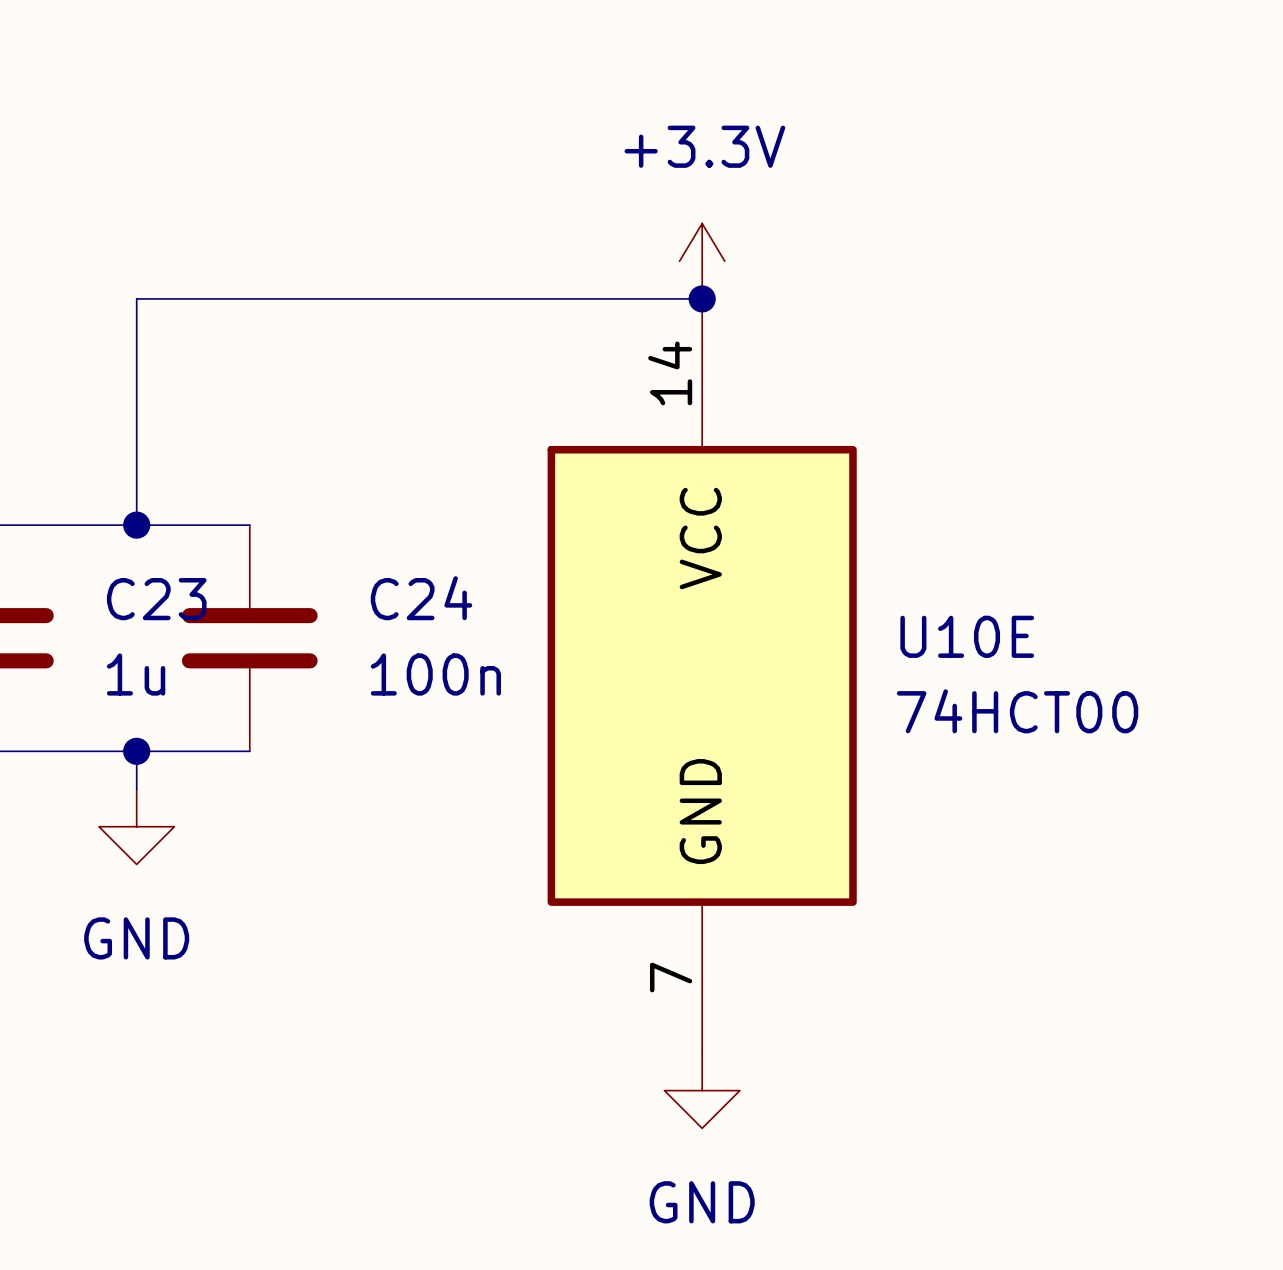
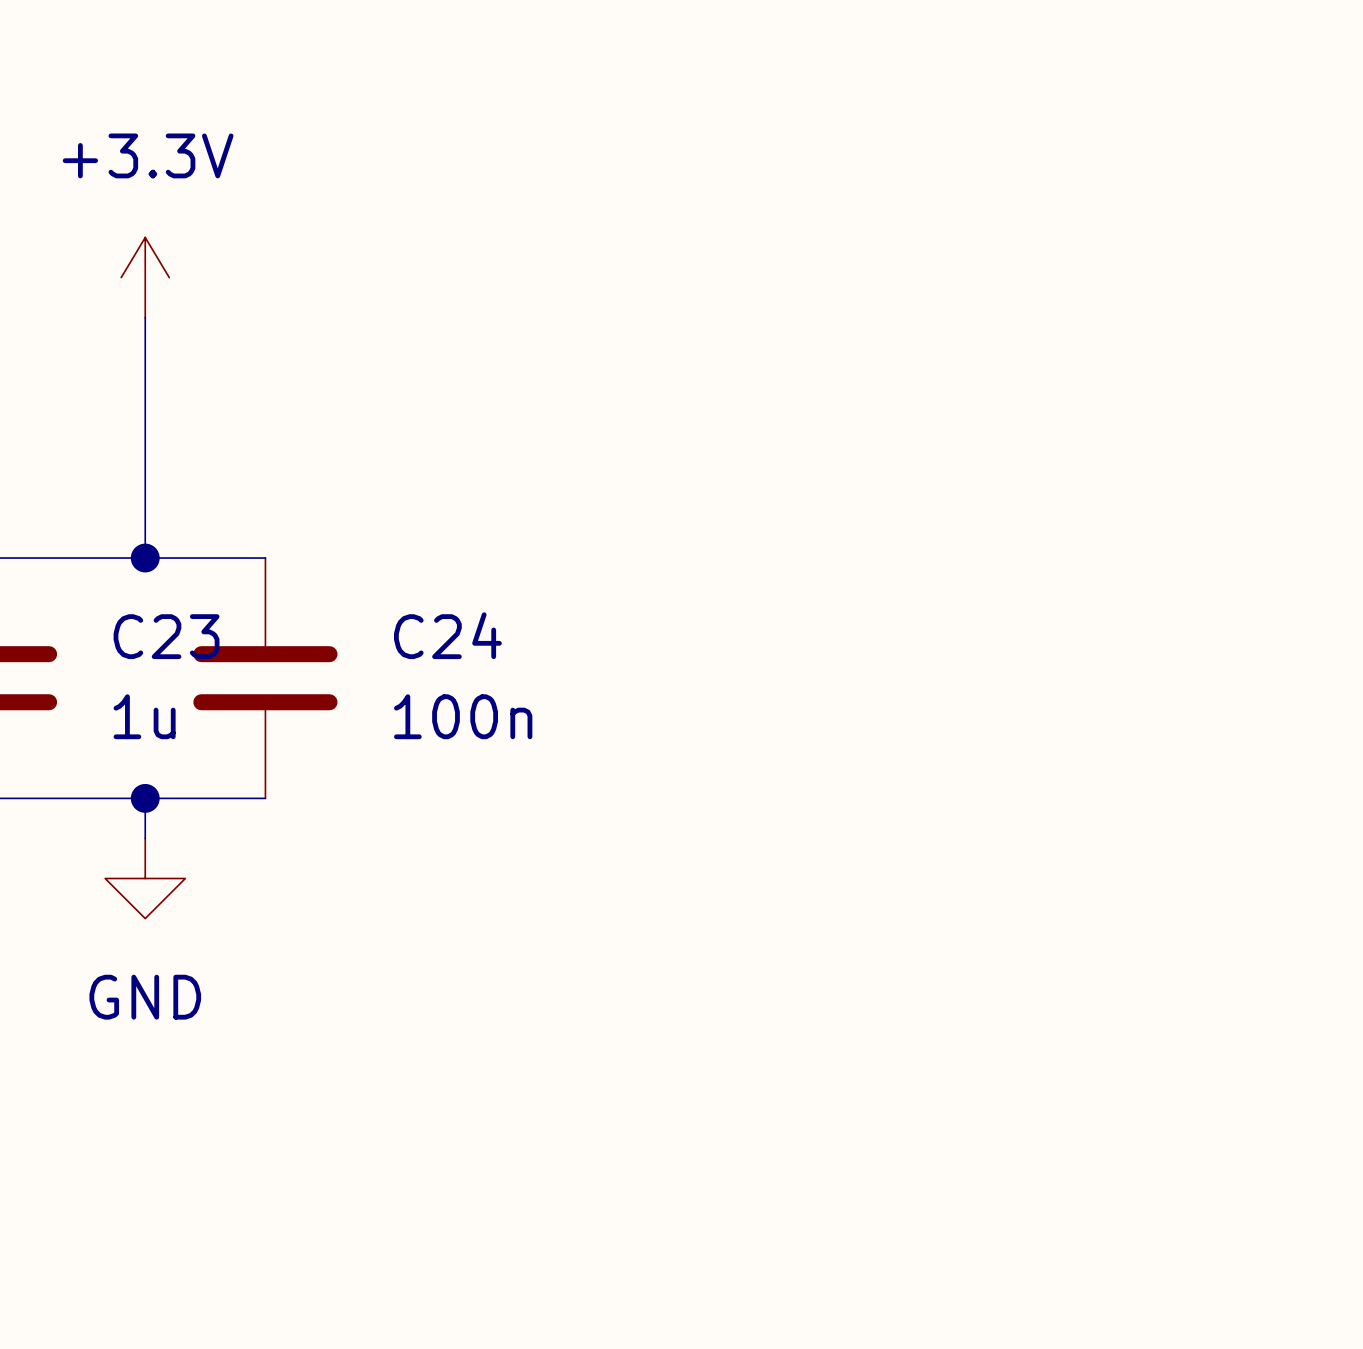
power symbol position: +3.3V (702, 261) -> +3.3V (145, 277)
wire: (136, 298) (702, 298) -> none
junction: (702, 298) -> none
U10E: 74HCT00 (702, 675) -> none
power symbol: GND (702, 1090) -> none

